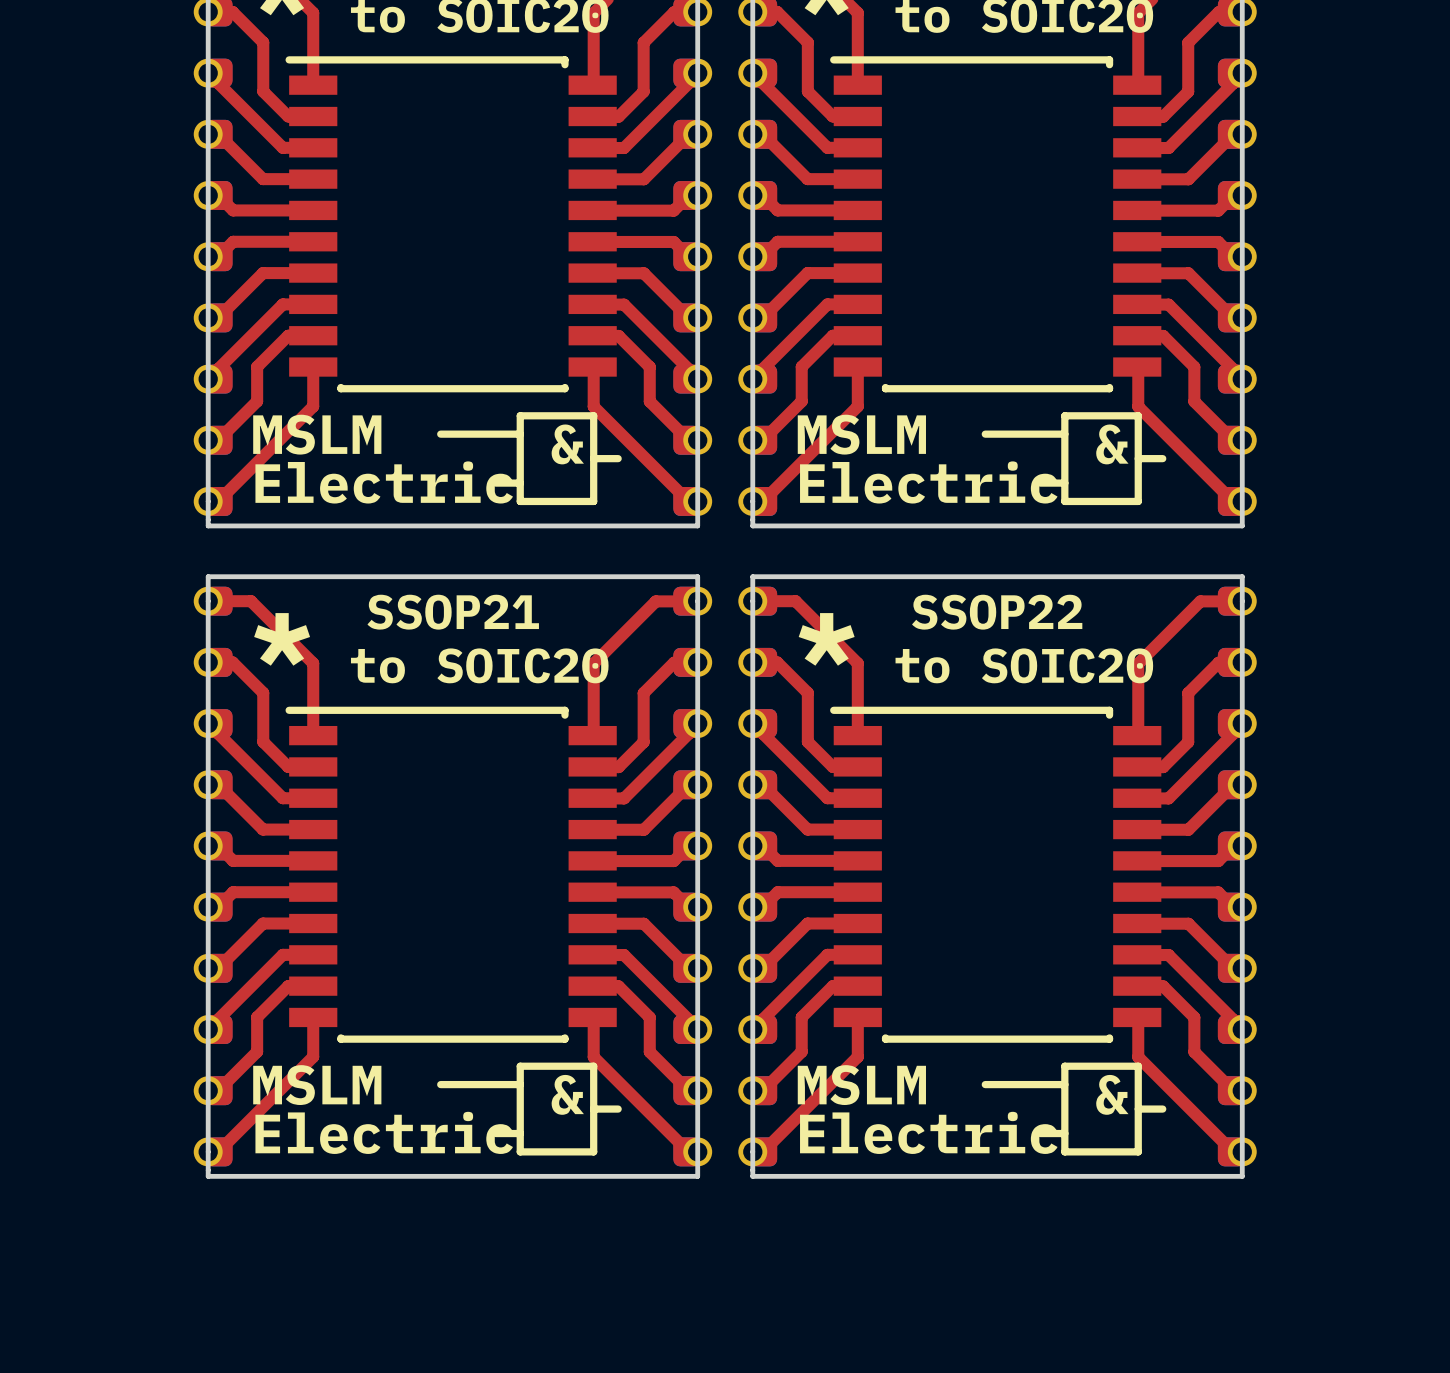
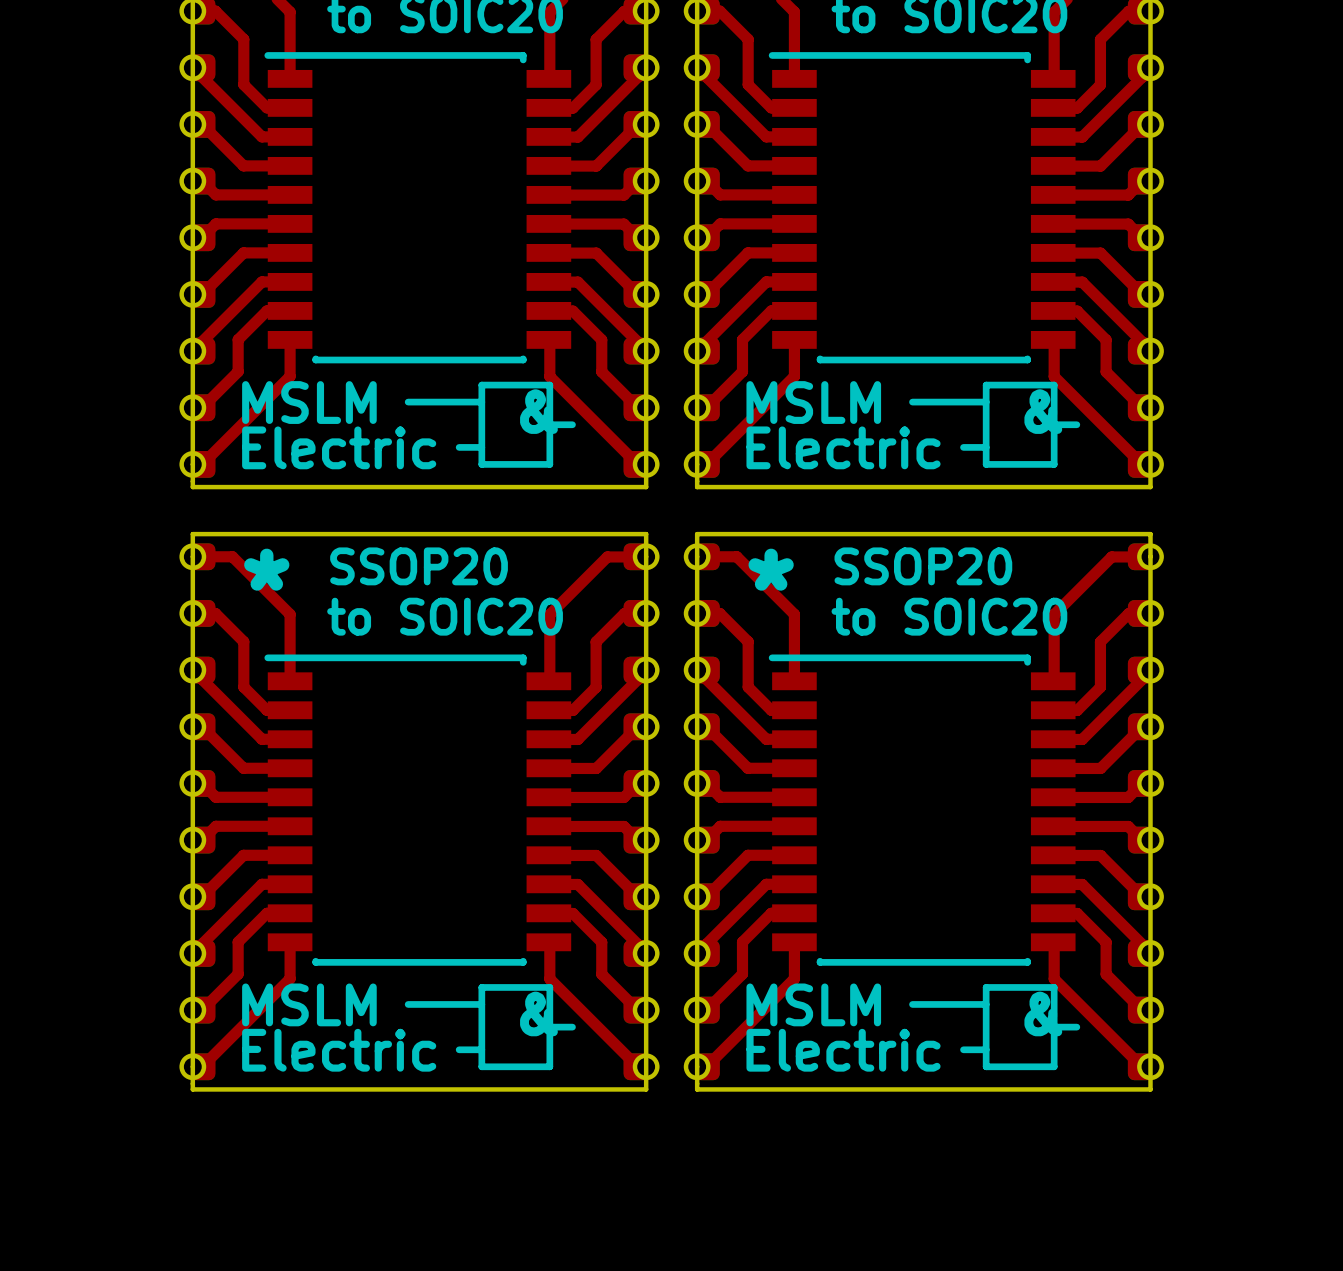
text: none -> SSOP20 (419, 566)
text: none -> SSOP20 (923, 566)
SSOP21 name: SSOP21 (453, 612) -> none
SSOP22 name: SSOP22 (997, 612) -> none

